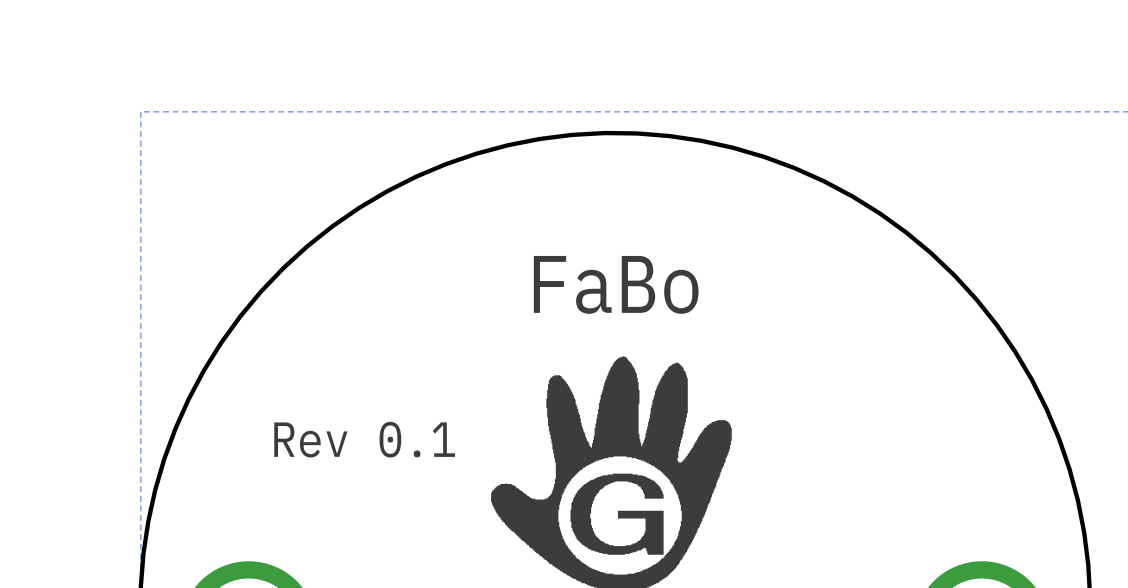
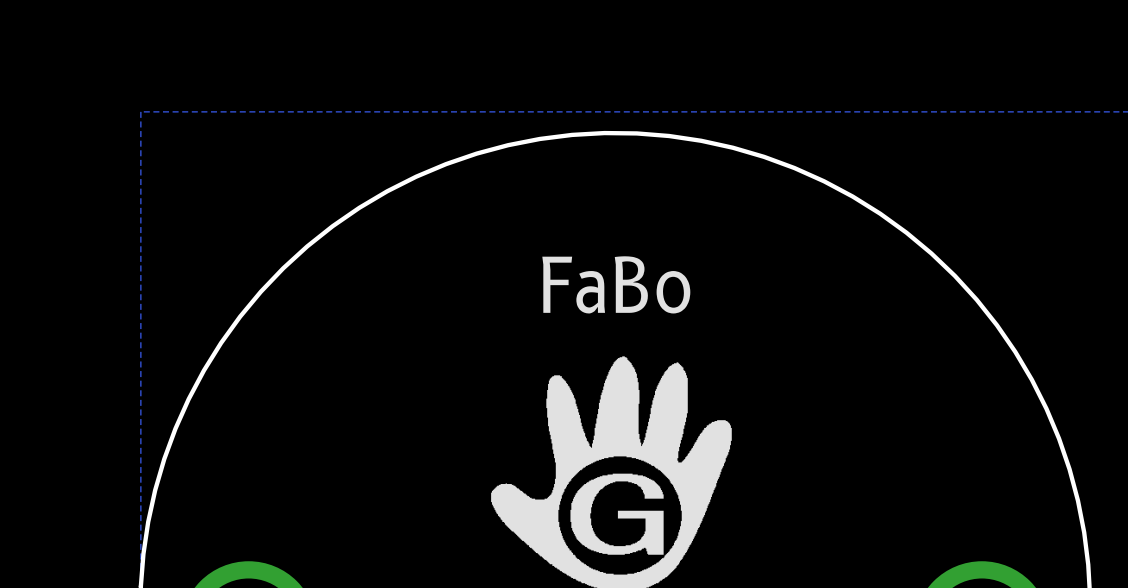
text: Rev 0.1 (364, 439) -> none

